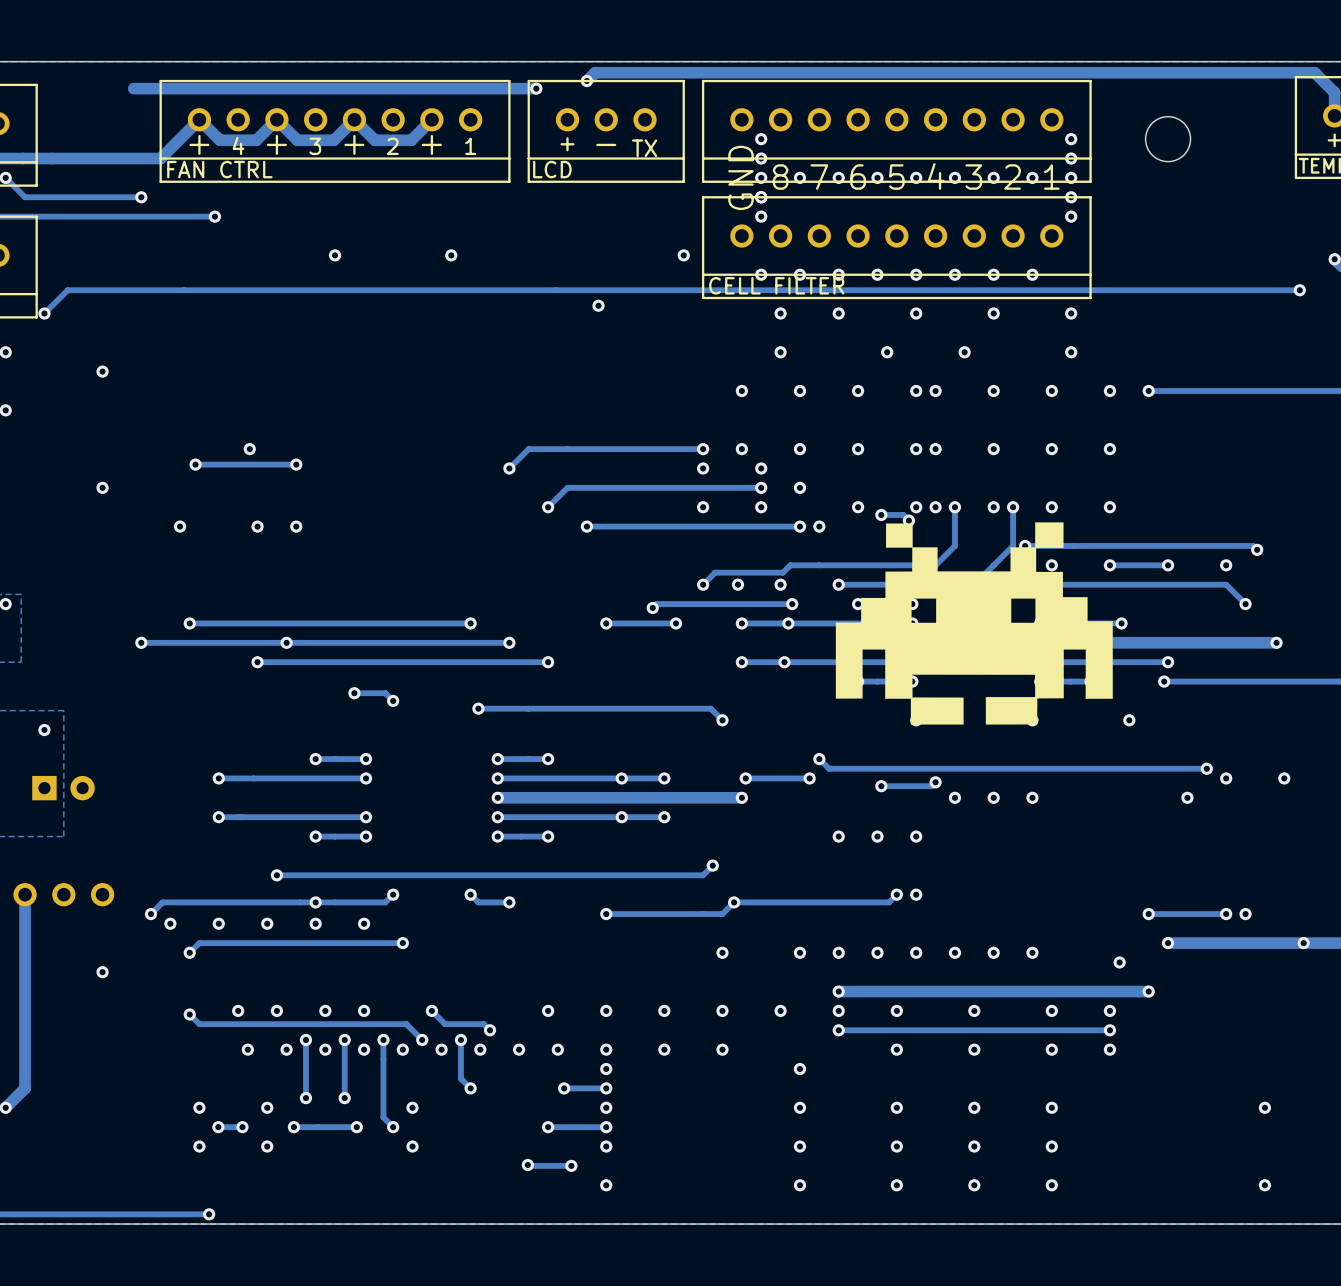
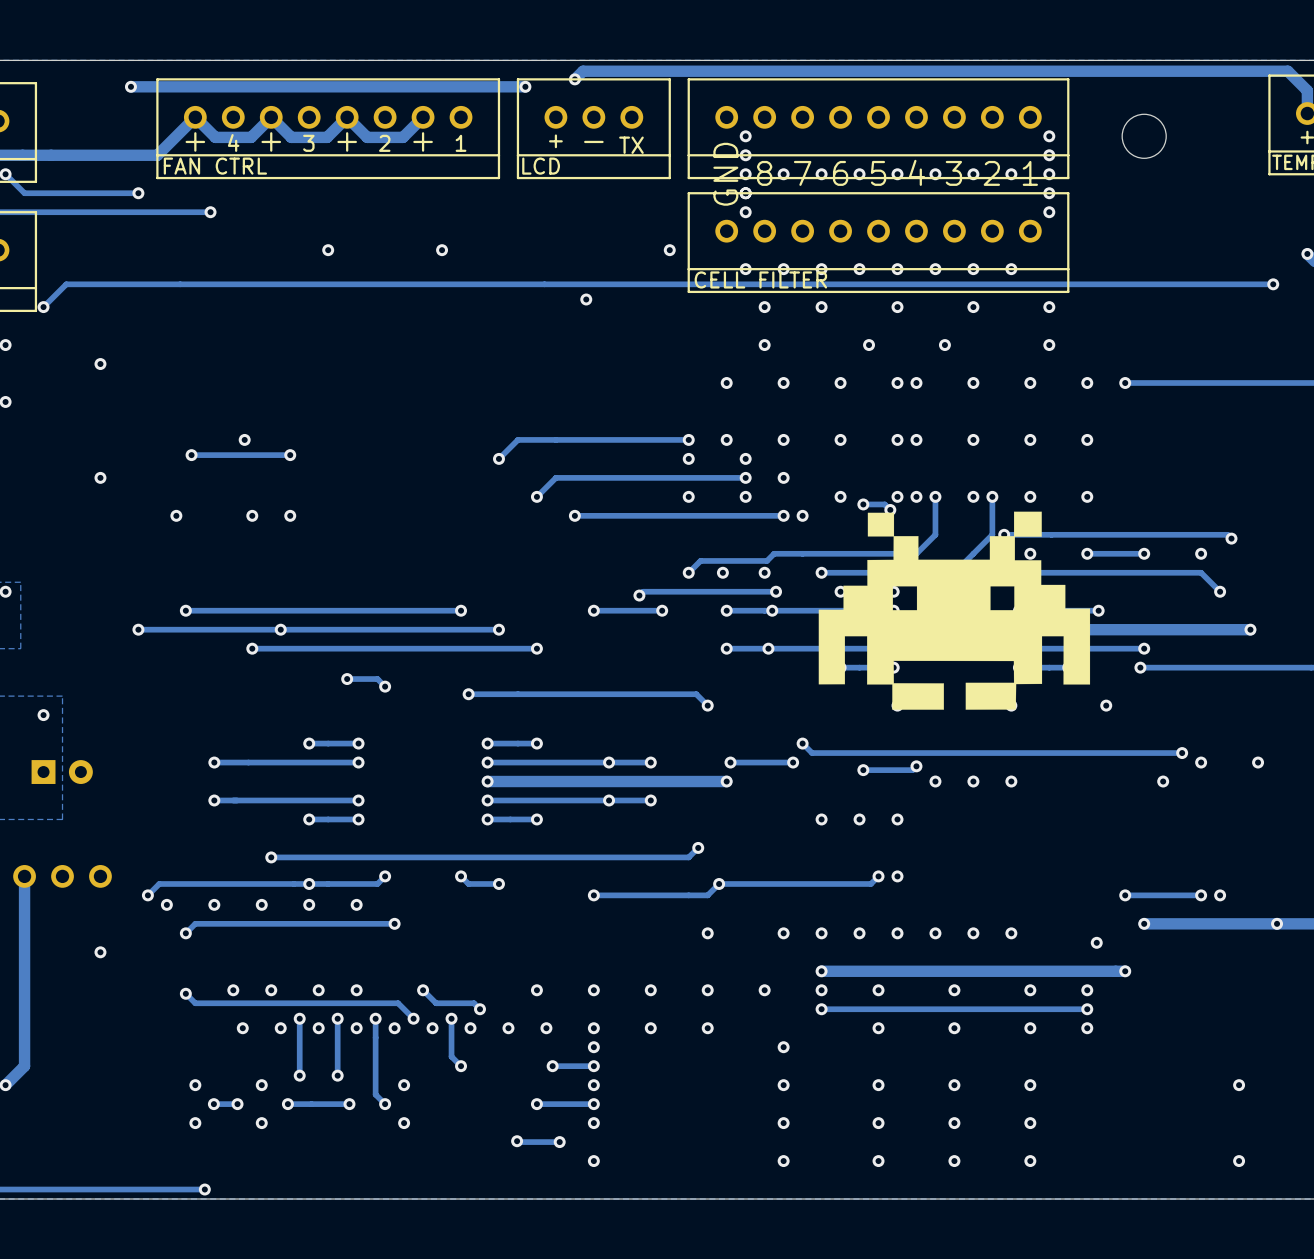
via: none -> (130, 86)

